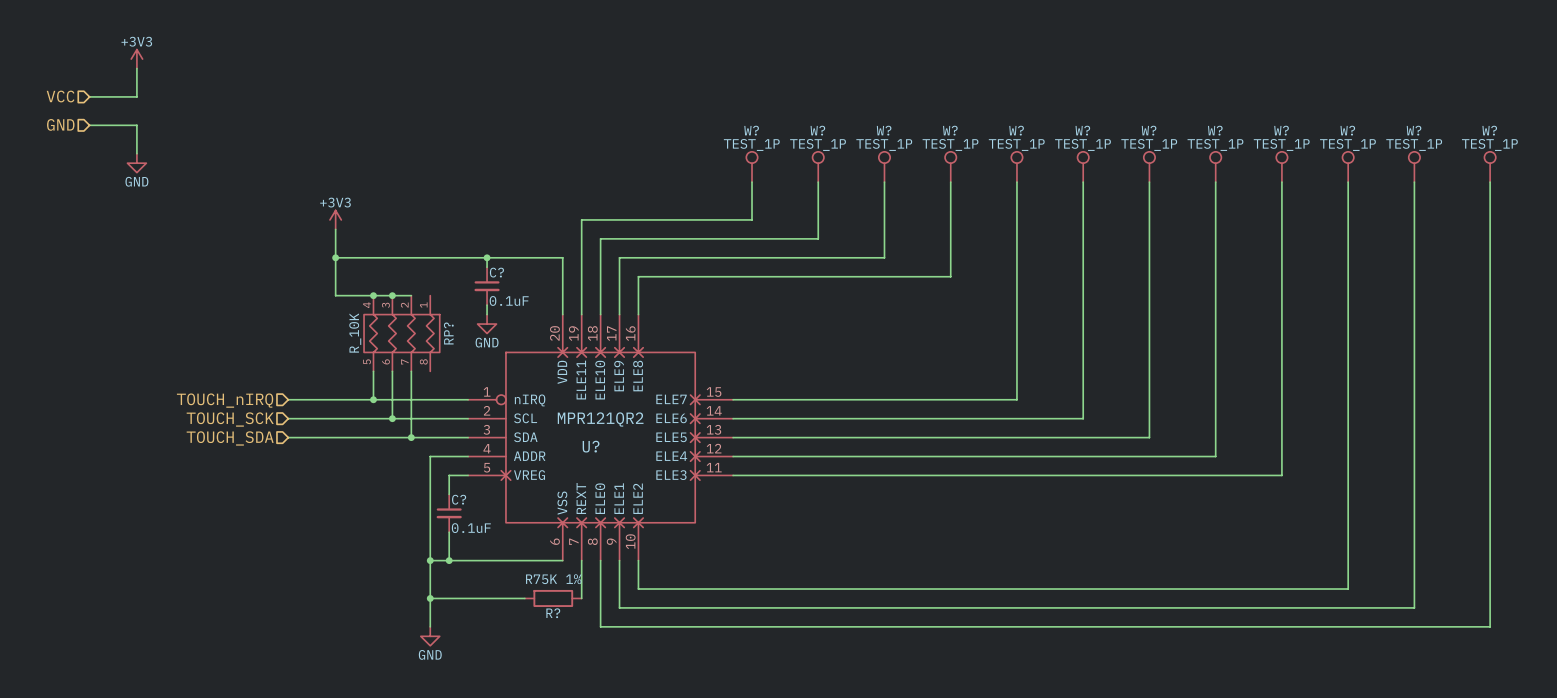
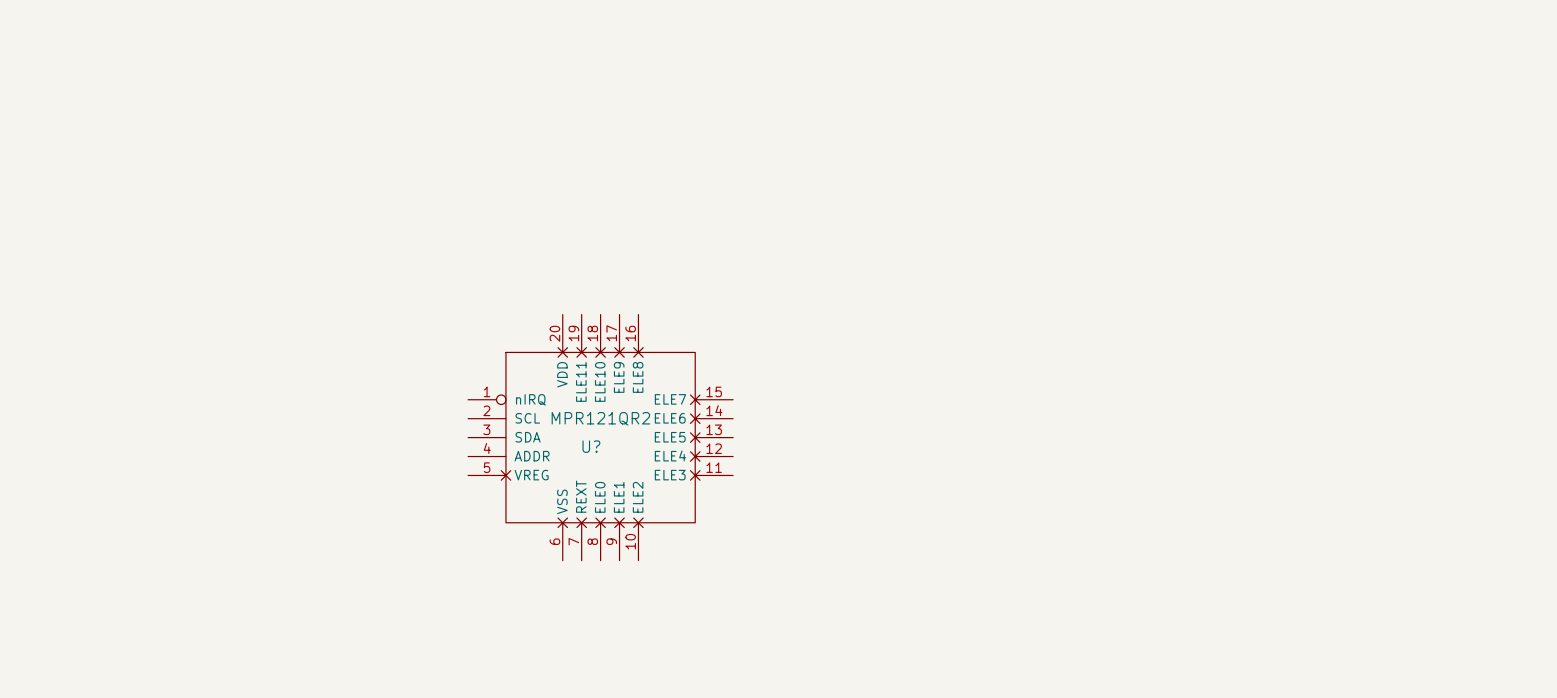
power symbol: +3V3 (136, 59) -> none
wire: (136, 68) (136, 96) (89, 96) -> none
hierarchical label: VCC (60, 96) -> none
hierarchical label: GND (60, 124) -> none
wire: (89, 125) (136, 125) (136, 153) -> none
power symbol: GND (136, 163) -> none
W?: TEST_1P (752, 166) -> none
W?: TEST_1P (818, 166) -> none
W?: TEST_1P (884, 166) -> none
W?: TEST_1P (950, 166) -> none
W?: TEST_1P (1016, 166) -> none
W?: TEST_1P (1083, 166) -> none
W?: TEST_1P (1149, 166) -> none
W?: TEST_1P (1215, 166) -> none
W?: TEST_1P (1281, 166) -> none
W?: TEST_1P (1348, 166) -> none
W?: TEST_1P (1414, 166) -> none
W?: TEST_1P (1490, 166) -> none
wire: (752, 182) (752, 219) (581, 219) (581, 314) -> none
wire: (818, 182) (818, 238) (600, 238) (600, 314) -> none
wire: (884, 182) (884, 257) (619, 257) (619, 314) -> none
wire: (950, 182) (950, 276) (638, 276) (638, 314) -> none
wire: (1016, 182) (1016, 399) (733, 399) -> none
wire: (1083, 182) (1083, 418) (733, 418) -> none
wire: (1149, 182) (1149, 437) (733, 437) -> none
wire: (1215, 182) (1215, 456) (733, 456) -> none
wire: (1281, 182) (1281, 475) (733, 475) -> none
wire: (1348, 182) (1348, 589) (638, 589) (638, 560) -> none
wire: (1414, 182) (1414, 607) (619, 607) (619, 560) -> none
wire: (1490, 182) (1490, 626) (600, 626) (600, 560) -> none
power symbol: +3V3 (335, 219) -> none
wire: (335, 229) (335, 295) (411, 295) -> none
wire: (335, 257) (562, 257) (562, 314) -> none
junction: (335, 257) -> none
wire: (487, 257) (487, 267) -> none
junction: (487, 257) -> none
C?: 0.1uF (487, 286) -> none
junction: (373, 295) -> none
junction: (392, 295) -> none
wire: (487, 305) (487, 314) -> none
power symbol: GND (487, 324) -> none
RP?: R_10K (401, 333) -> none
wire: (373, 371) (373, 399) -> none
wire: (392, 371) (392, 418) -> none
wire: (411, 371) (411, 437) -> none
wire: (288, 399) (468, 399) -> none
junction: (373, 399) -> none
hierarchical label: TOUCH_nIRQ (225, 400) -> none
wire: (288, 418) (468, 418) -> none
junction: (392, 418) -> none
hierarchical label: TOUCH_SCK (230, 419) -> none
wire: (288, 437) (468, 437) -> none
junction: (411, 437) -> none
hierarchical label: TOUCH_SDA (230, 438) -> none
wire: (468, 456) (430, 456) (430, 626) -> none
wire: (468, 475) (449, 475) (449, 494) -> none
C?: 0.1uF (449, 513) -> none
wire: (449, 532) (449, 560) -> none
wire: (430, 560) (562, 560) -> none
junction: (430, 560) -> none
junction: (449, 560) -> none
wire: (581, 560) (581, 598) -> none
wire: (430, 598) (524, 598) -> none
junction: (430, 598) -> none
R?: R75K 1% (553, 598) -> none
power symbol: GND (430, 636) -> none

